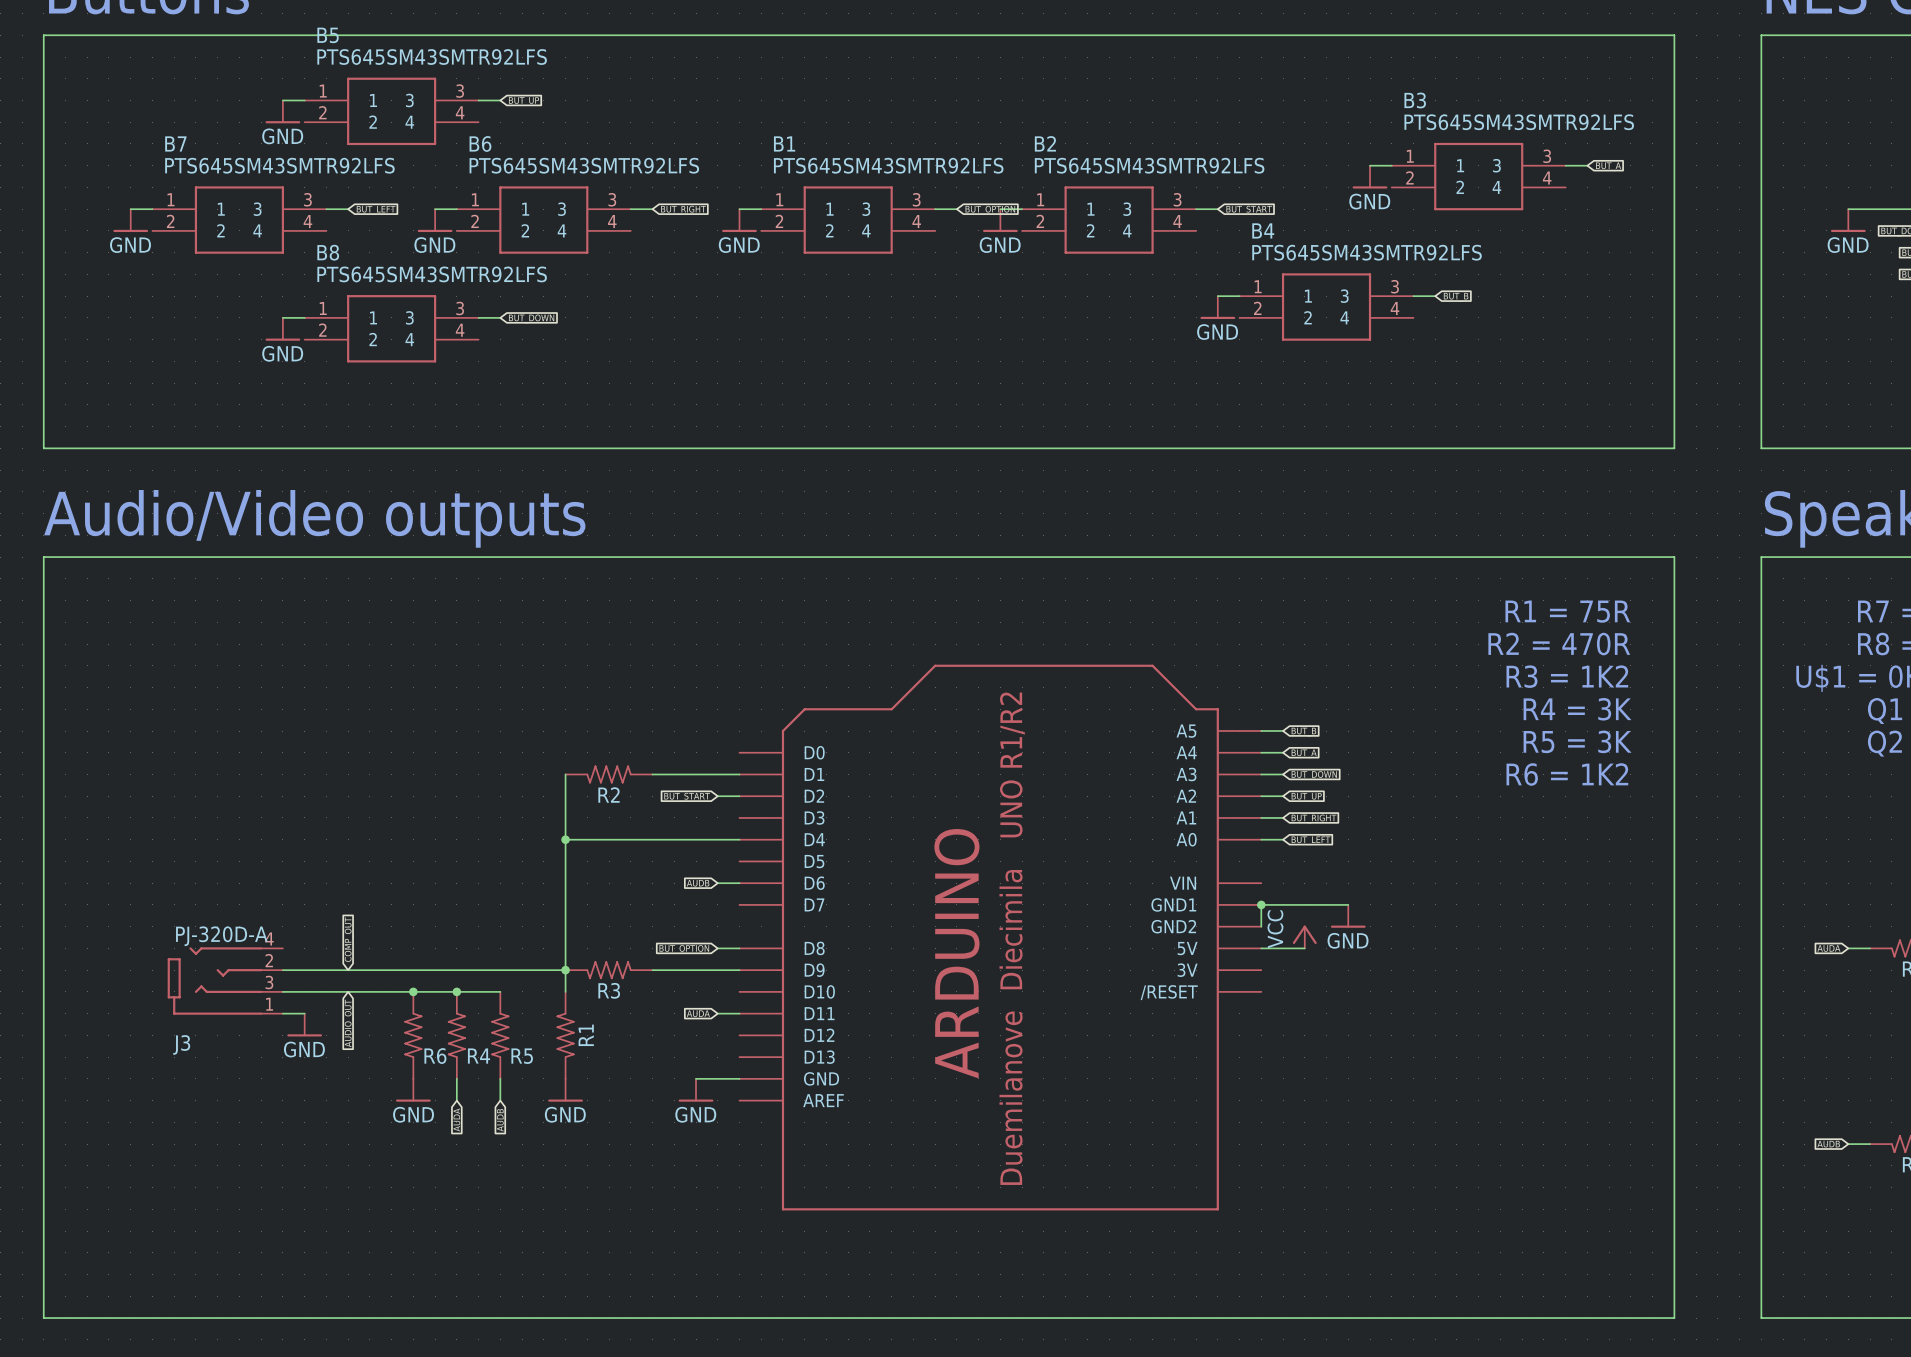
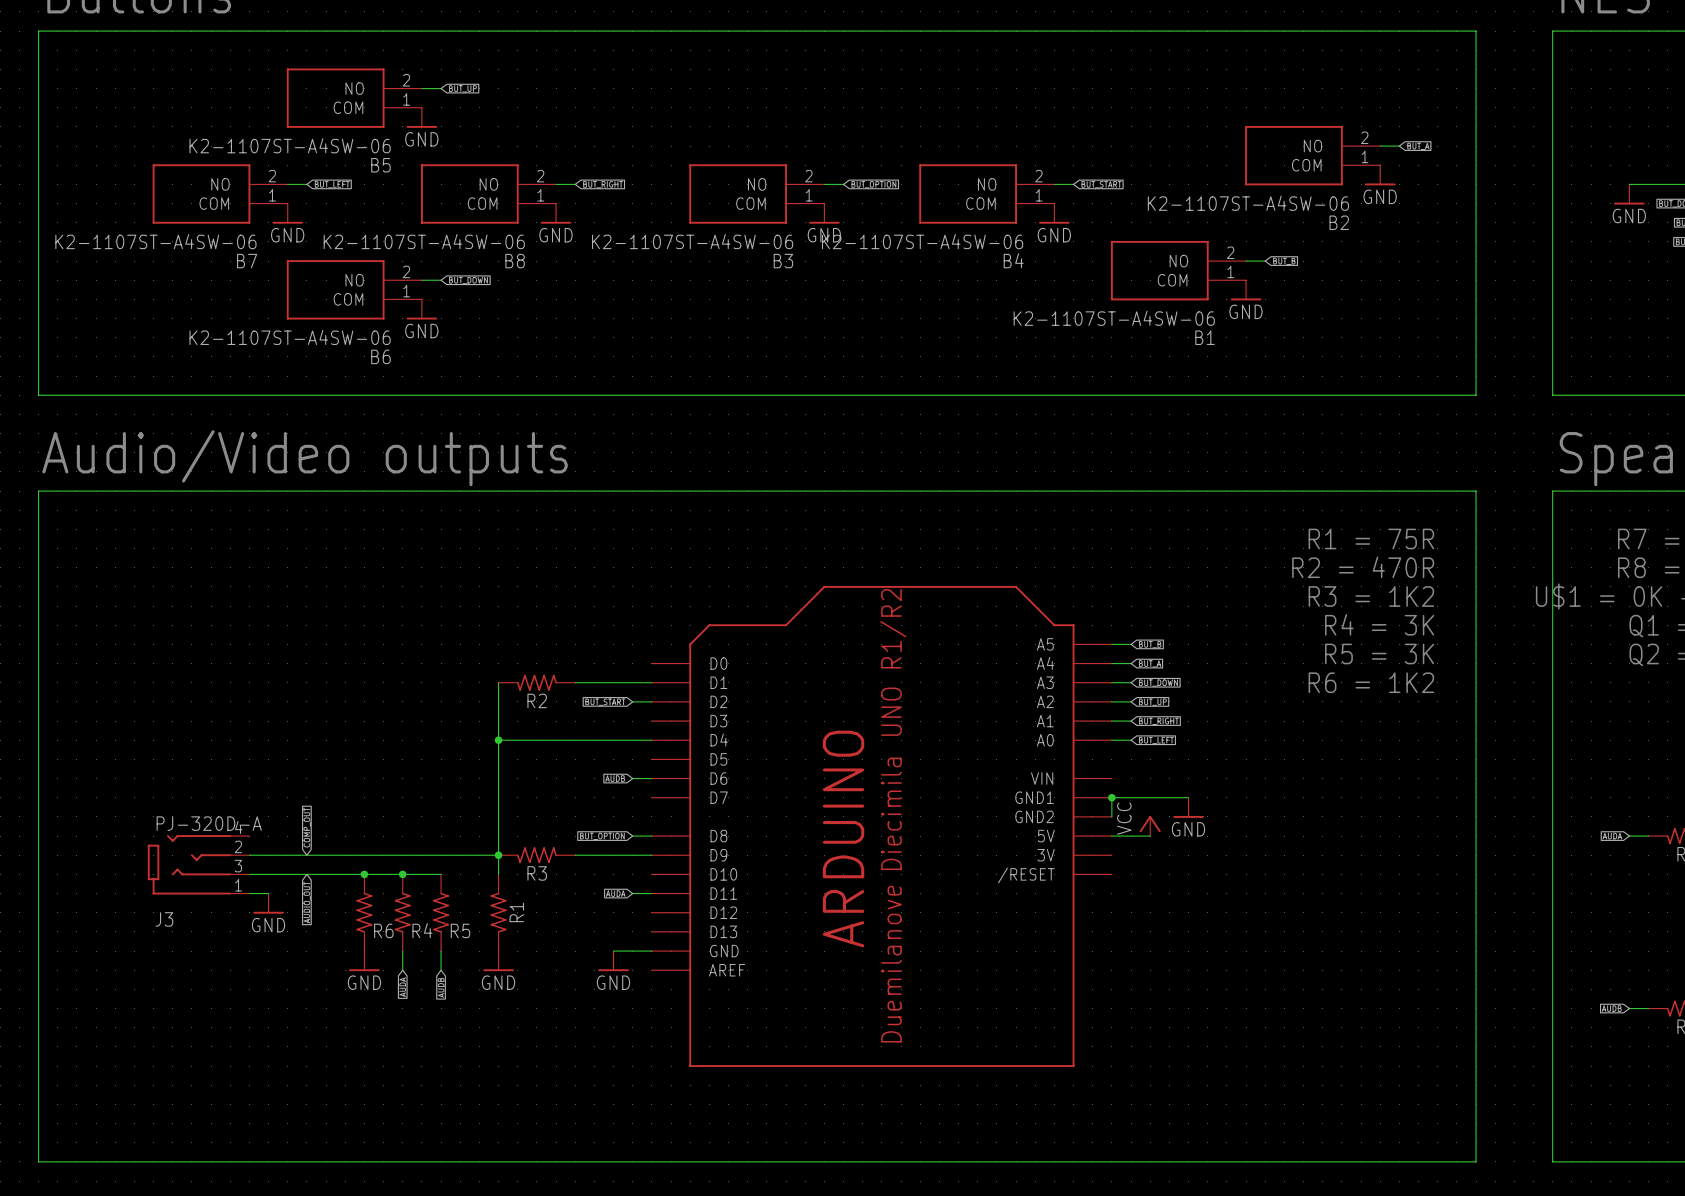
B5 name position: B5 (328, 35) -> B5 (380, 165)
B5 value: PTS645SM43SMTR92LFS (432, 57) -> K2-1107ST-A4SW-06 (290, 145)
B5 symbol: [304, 77, 479, 146] -> [286, 68, 422, 128]
wire: (282, 100) (304, 100) -> none
B3 name position: B3 (1415, 100) -> B3 (783, 261)
power symbol: GND (282, 111) -> none
B3 value: PTS645SM43SMTR92LFS (1519, 122) -> K2-1107ST-A4SW-06 (692, 241)
power symbol: none -> GND (421, 117)
B3 symbol: [1391, 142, 1566, 211] -> [689, 164, 825, 224]
B7 name position: B7 (175, 143) -> B7 (247, 261)
B6 name position: B6 (480, 143) -> B6 (380, 356)
B1 name position: B1 (784, 143) -> B1 (1205, 337)
B2 name position: B2 (1045, 143) -> B2 (1339, 222)
B7 value: PTS645SM43SMTR92LFS (279, 165) -> K2-1107ST-A4SW-06 (155, 241)
B6 value: PTS645SM43SMTR92LFS (584, 165) -> K2-1107ST-A4SW-06 (290, 337)
B1 value: PTS645SM43SMTR92LFS (888, 165) -> K2-1107ST-A4SW-06 (1114, 318)
B2 value: PTS645SM43SMTR92LFS (1149, 165) -> K2-1107ST-A4SW-06 (1248, 203)
wire: (1370, 165) (1391, 165) -> none
power symbol: GND (1370, 177) -> none
B7 symbol: [152, 186, 327, 254] -> [152, 164, 288, 224]
B6 symbol: [456, 186, 631, 254] -> [286, 260, 422, 320]
B1 symbol: [761, 186, 936, 254] -> [1110, 240, 1247, 301]
B2 symbol: [1022, 186, 1197, 254] -> [1245, 125, 1381, 186]
power symbol: none -> GND (1380, 175)
wire: (130, 209) (152, 209) -> none
wire: (435, 209) (456, 209) -> none
wire: (739, 209) (761, 209) -> none
wire: (1000, 209) (1022, 209) -> none
power symbol: GND (130, 220) -> none
power symbol: GND (435, 220) -> none
power symbol: GND (739, 220) -> none
power symbol position: GND (1000, 220) -> GND (824, 213)
B4 name position: B4 (1263, 230) -> B4 (1013, 260)
power symbol: none -> GND (287, 213)
power symbol: none -> GND (556, 213)
B8 name position: B8 (328, 252) -> B8 (515, 261)
B4 value: PTS645SM43SMTR92LFS (1367, 252) -> K2-1107ST-A4SW-06 (922, 241)
B4 symbol: [1239, 273, 1414, 341] -> [919, 164, 1055, 224]
B8 value: PTS645SM43SMTR92LFS (432, 274) -> K2-1107ST-A4SW-06 (424, 241)
B8 symbol: [304, 295, 479, 363] -> [420, 164, 557, 224]
wire: (1217, 296) (1239, 296) -> none
power symbol position: GND (1217, 307) -> GND (1054, 213)
wire: (282, 317) (304, 317) -> none
power symbol: GND (282, 329) -> none
power symbol: none -> GND (1246, 290)
power symbol: none -> GND (421, 309)

